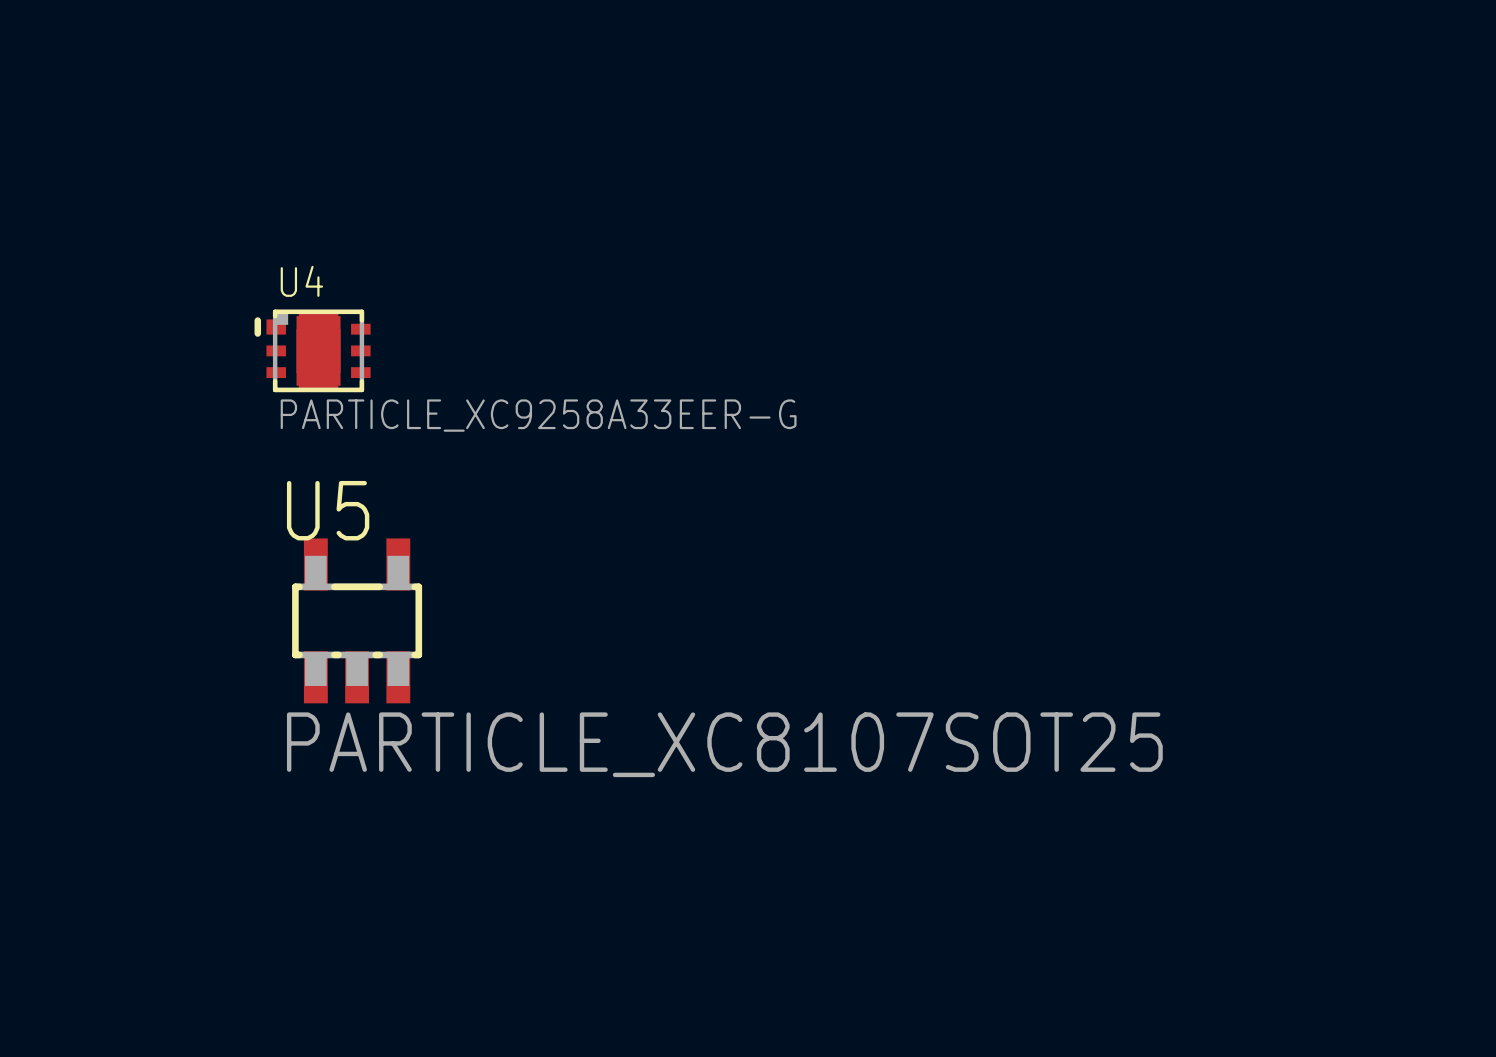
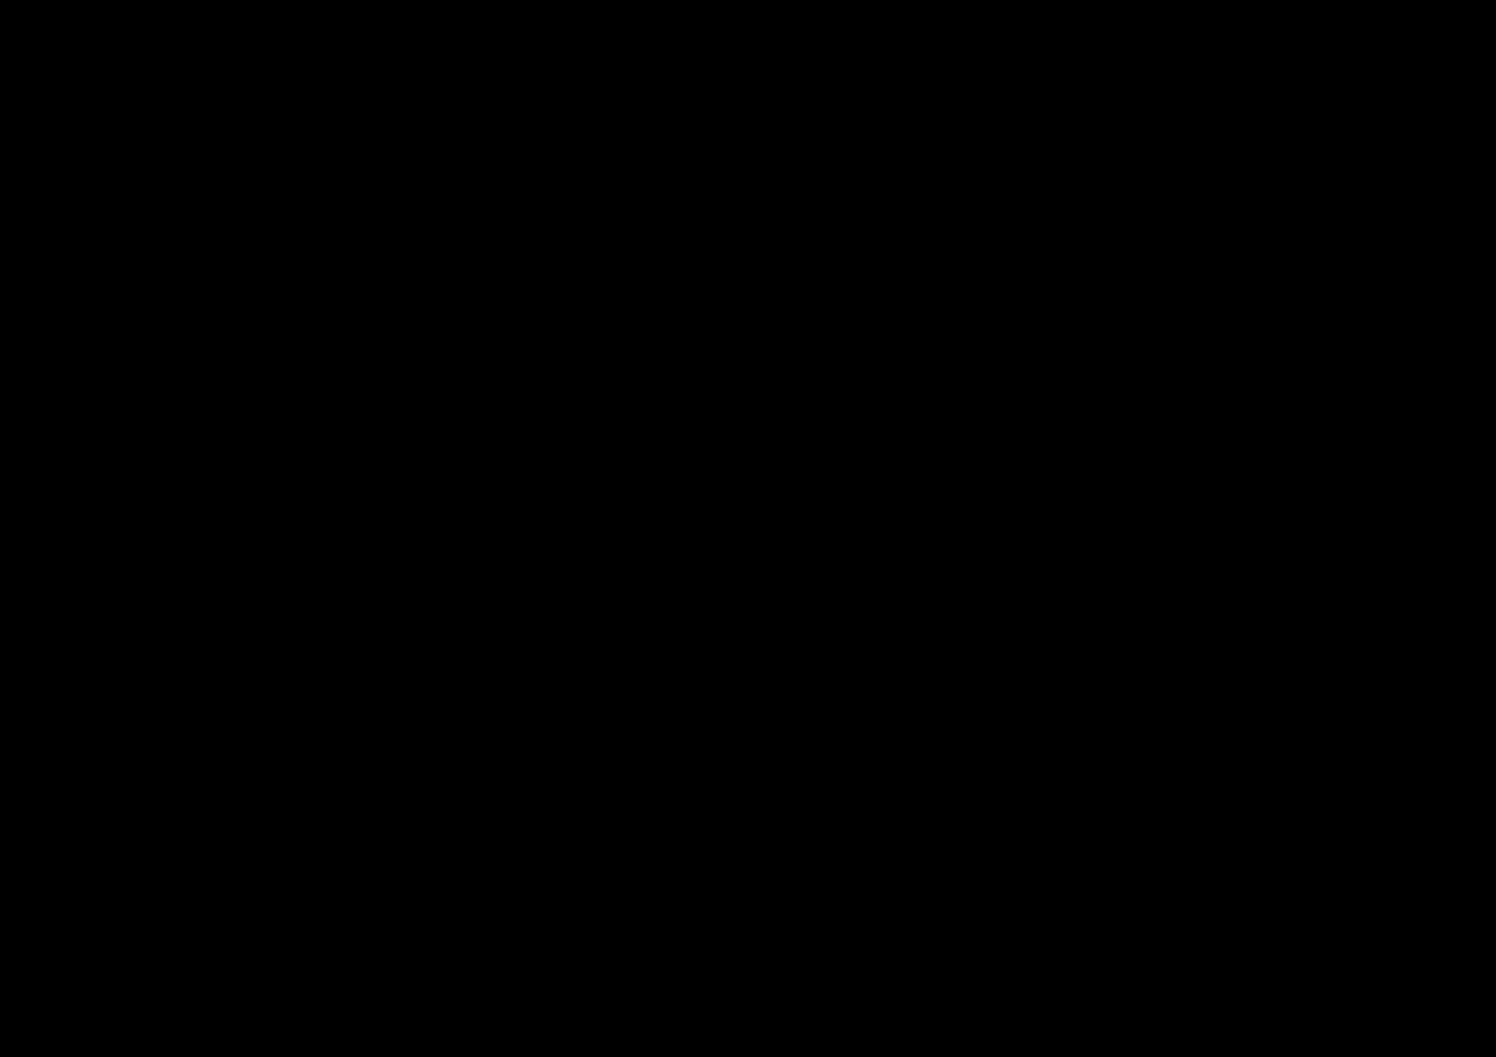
U4: PARTICLE_XC9258A33EER-G (312, 350) -> none
U5: PARTICLE_XC8107SOT25 (357, 620) -> none

